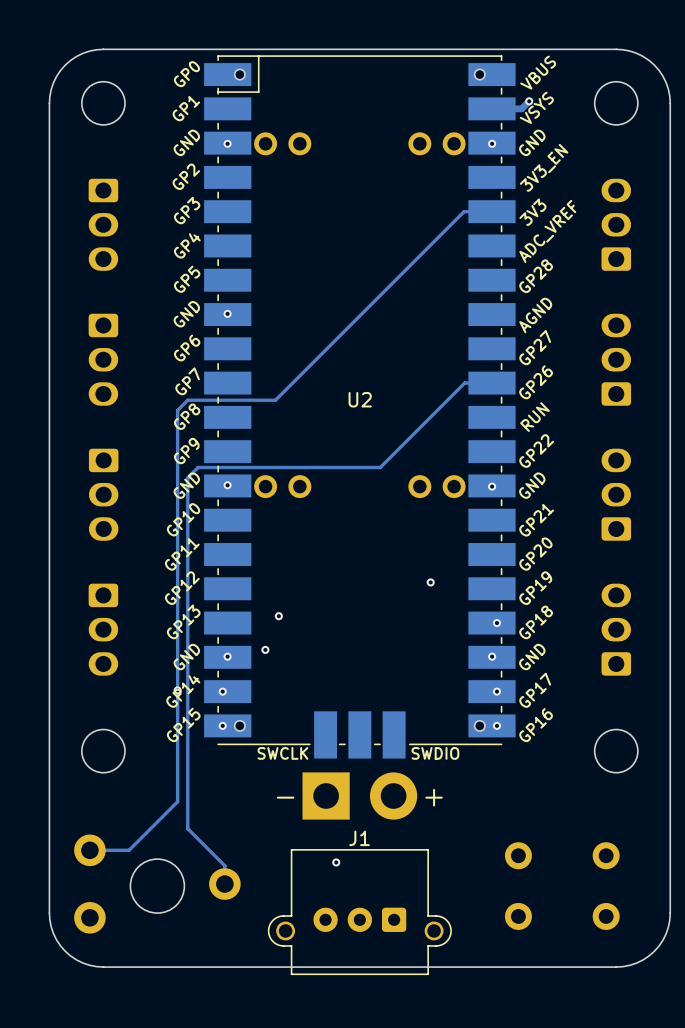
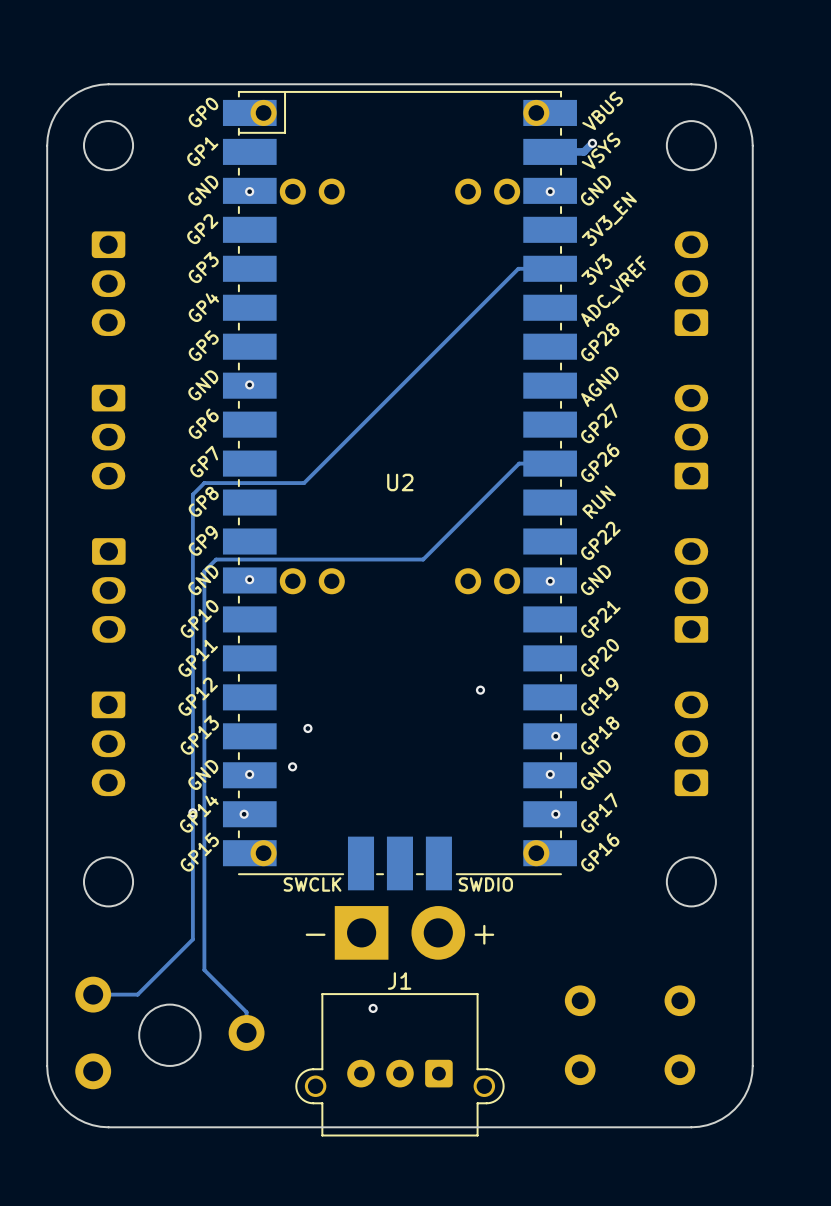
U2 footprint: [204, 55, 516, 759] -> [222, 91, 577, 891]
via: (222, 725) -> none
via: (496, 725) -> none

